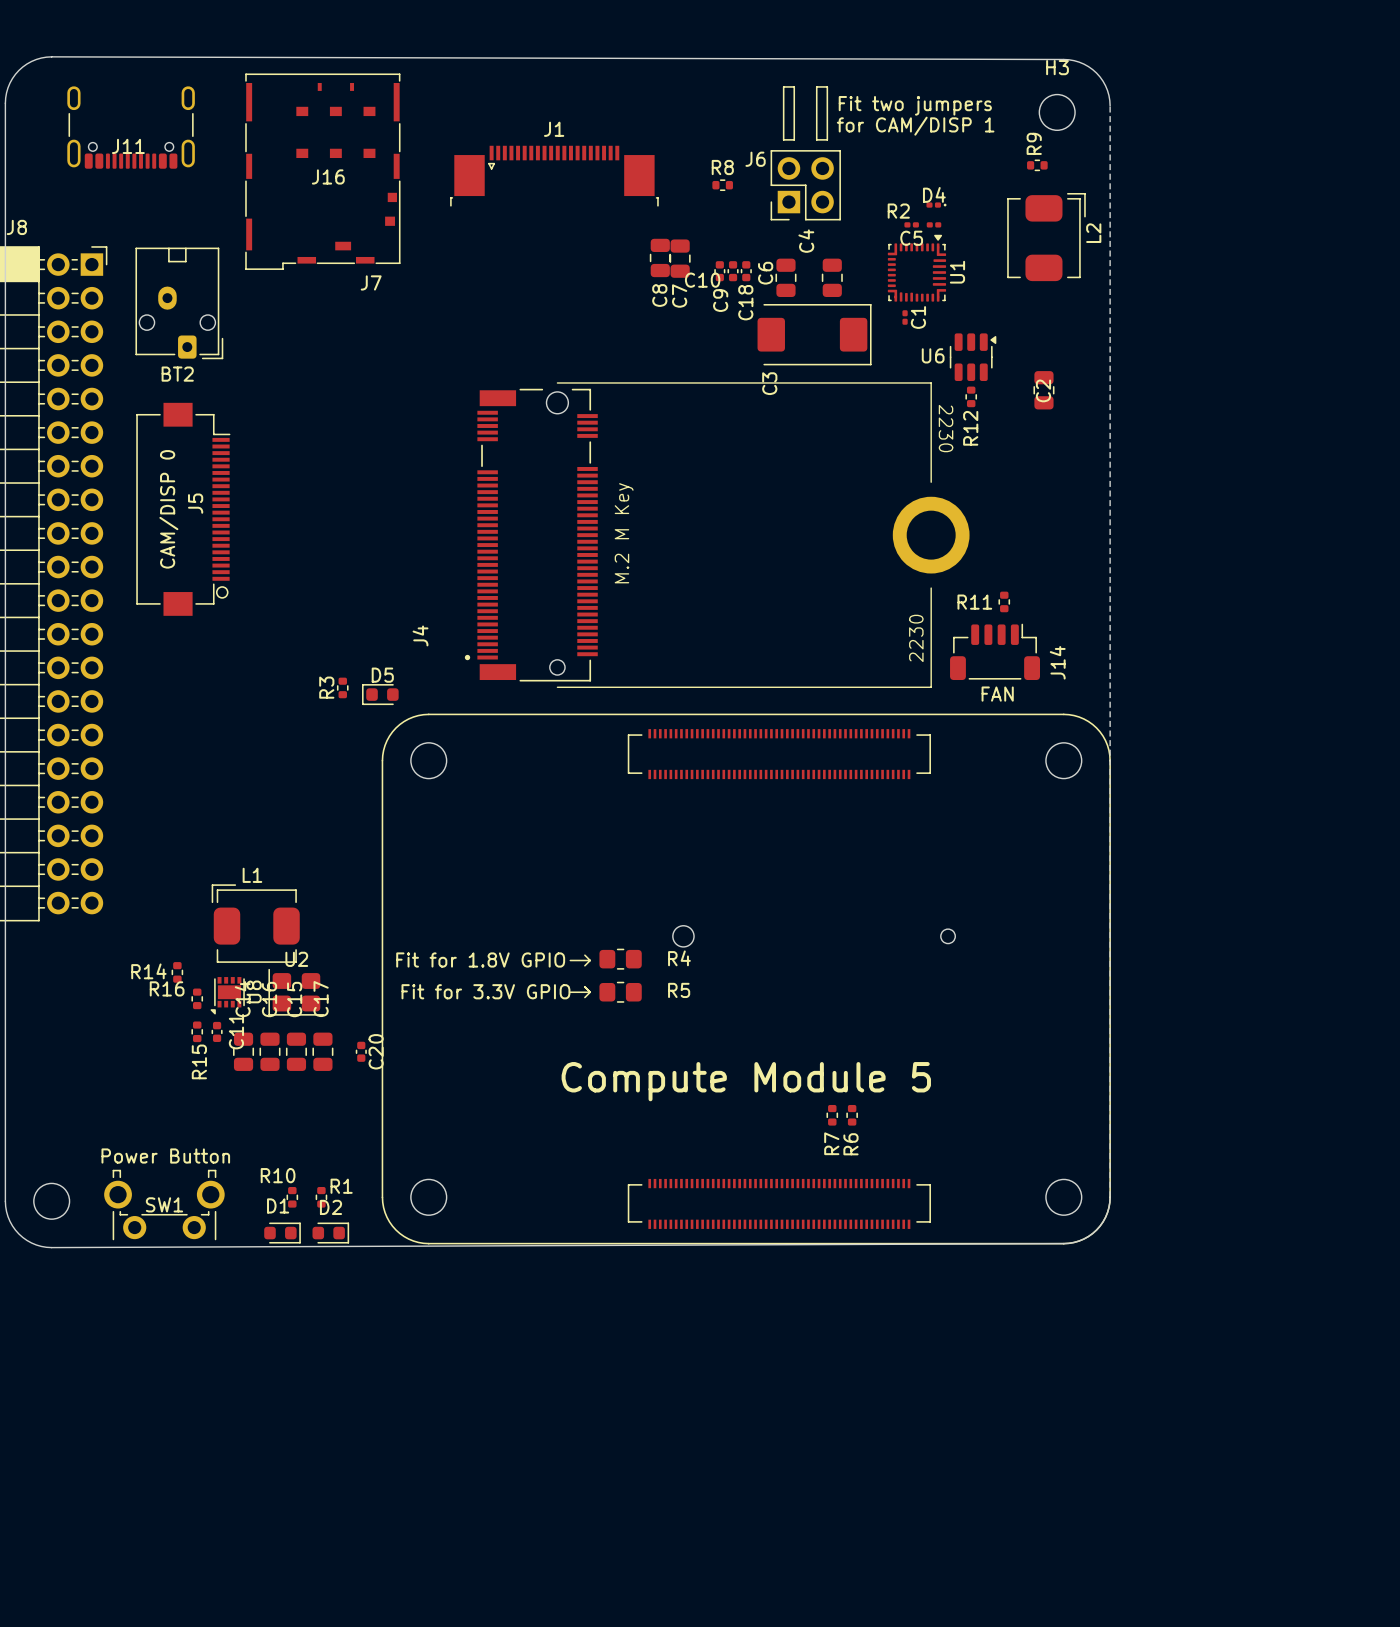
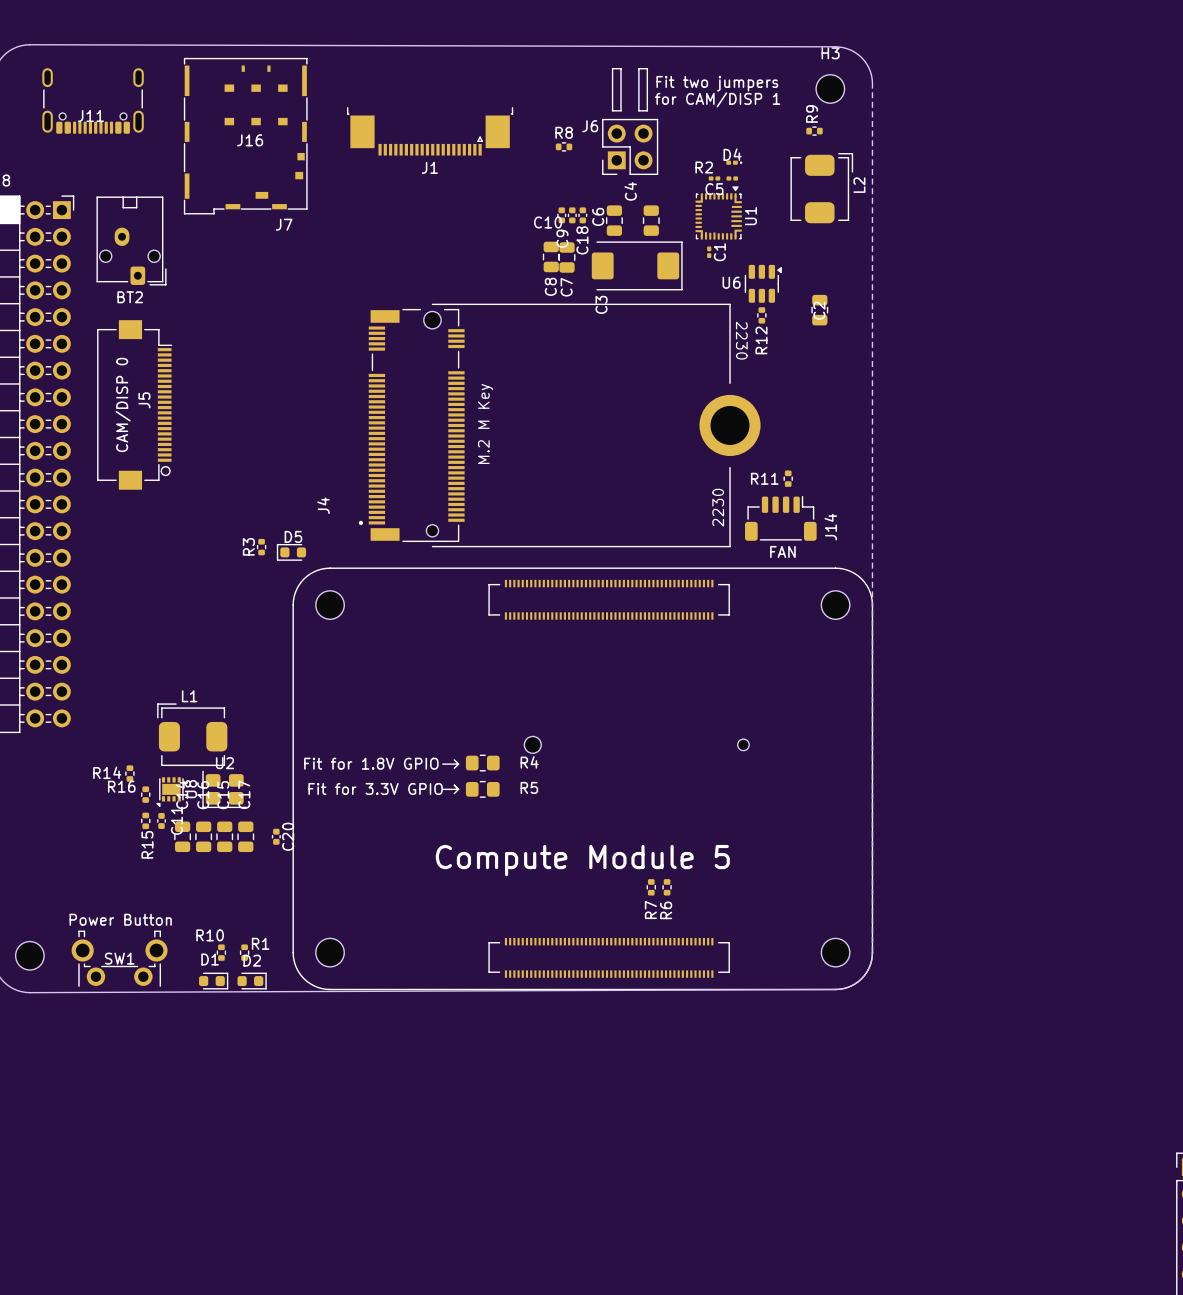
J1 rotation: 0° (554, 176) -> 180° (430, 131)
C8 position: (660, 257) -> (551, 256)
C7 position: (680, 258) -> (567, 257)

